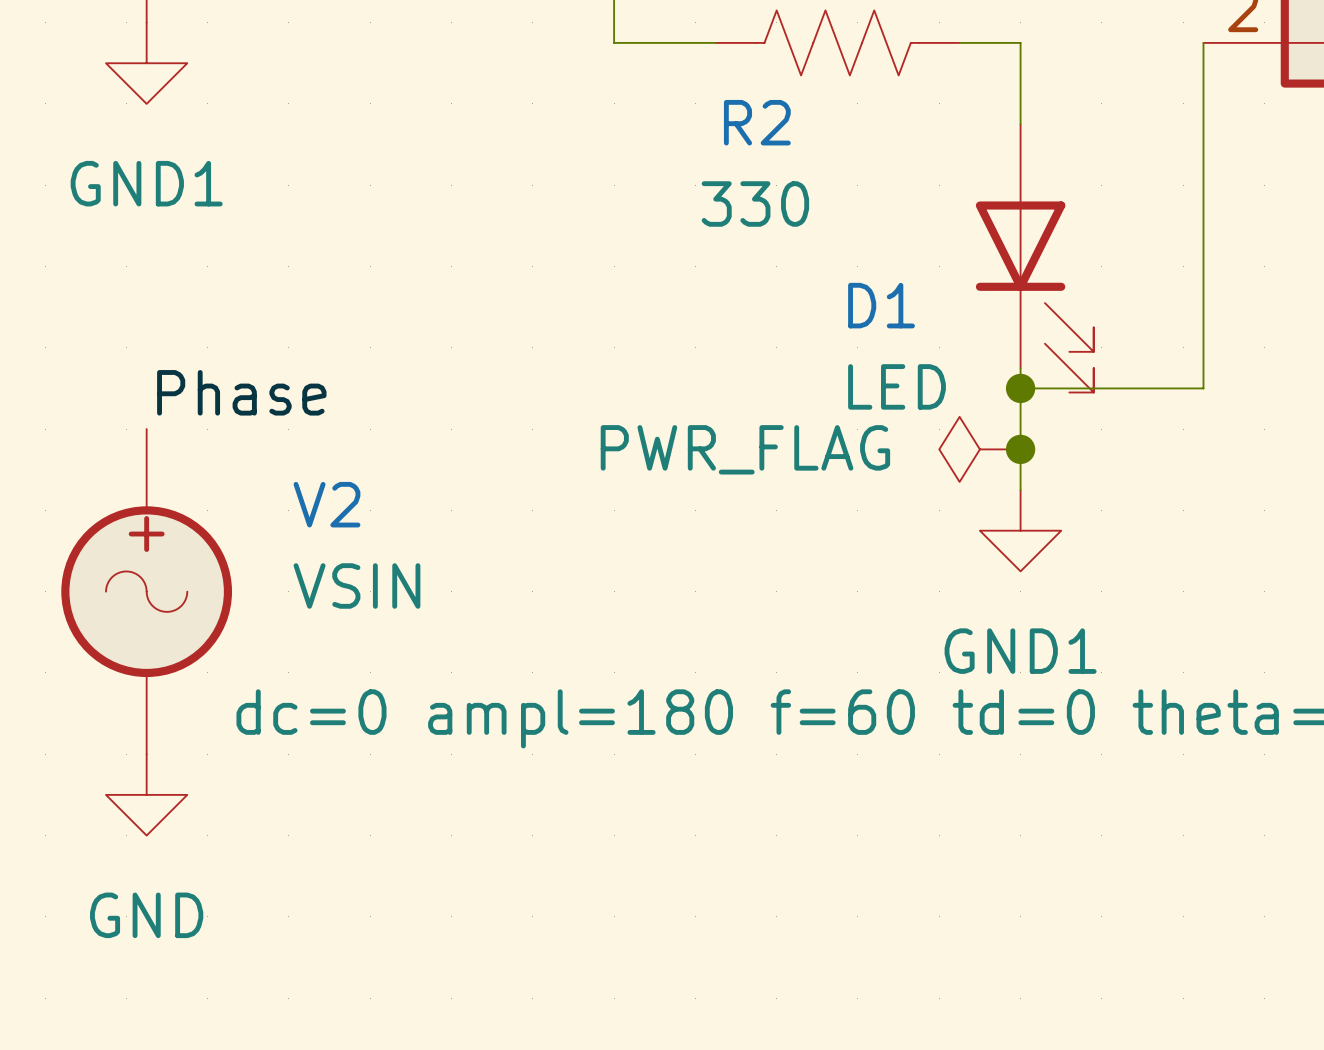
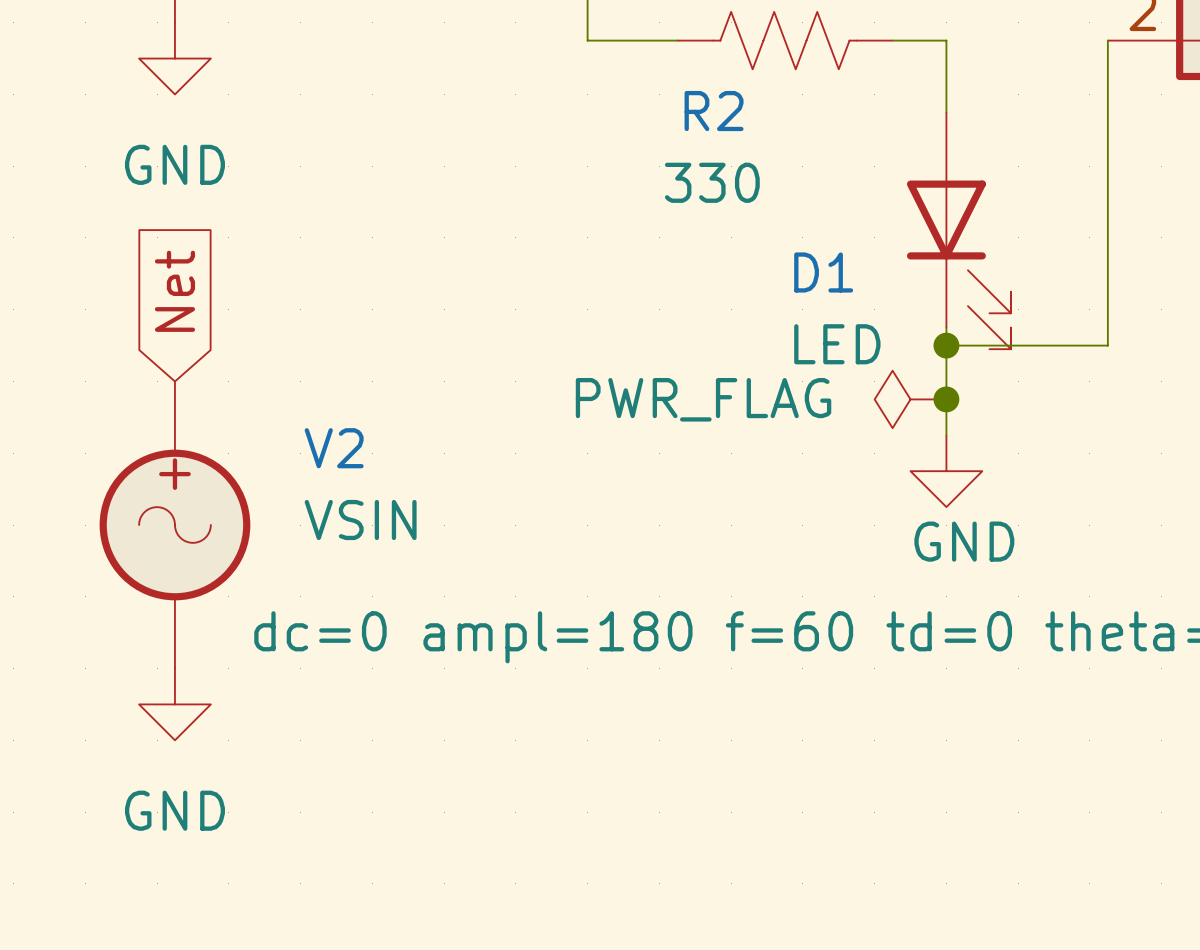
power symbol: GND1 (146, 63) -> GND (174, 58)
global label: none -> Net (174, 291)
label: Phase (241, 392) -> none
power symbol: GND1 (1020, 530) -> GND (946, 471)

